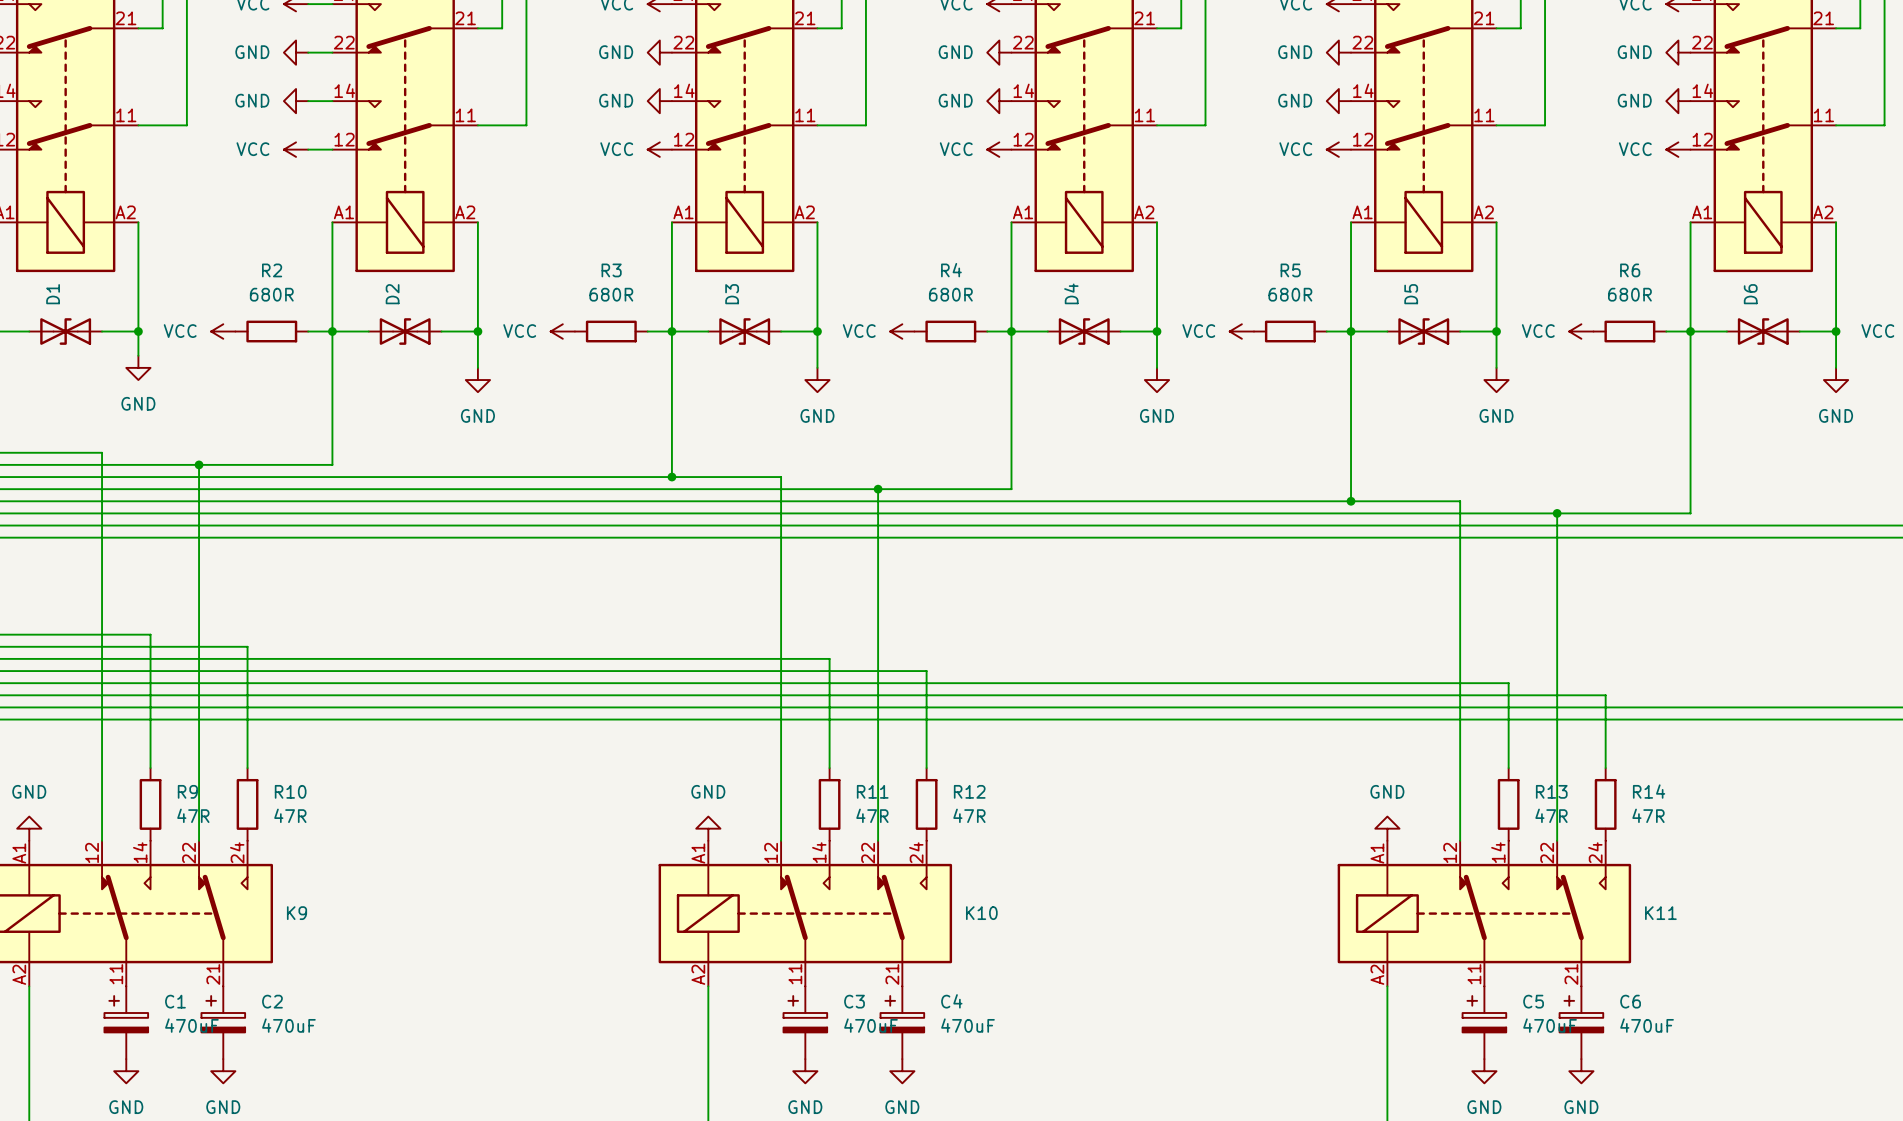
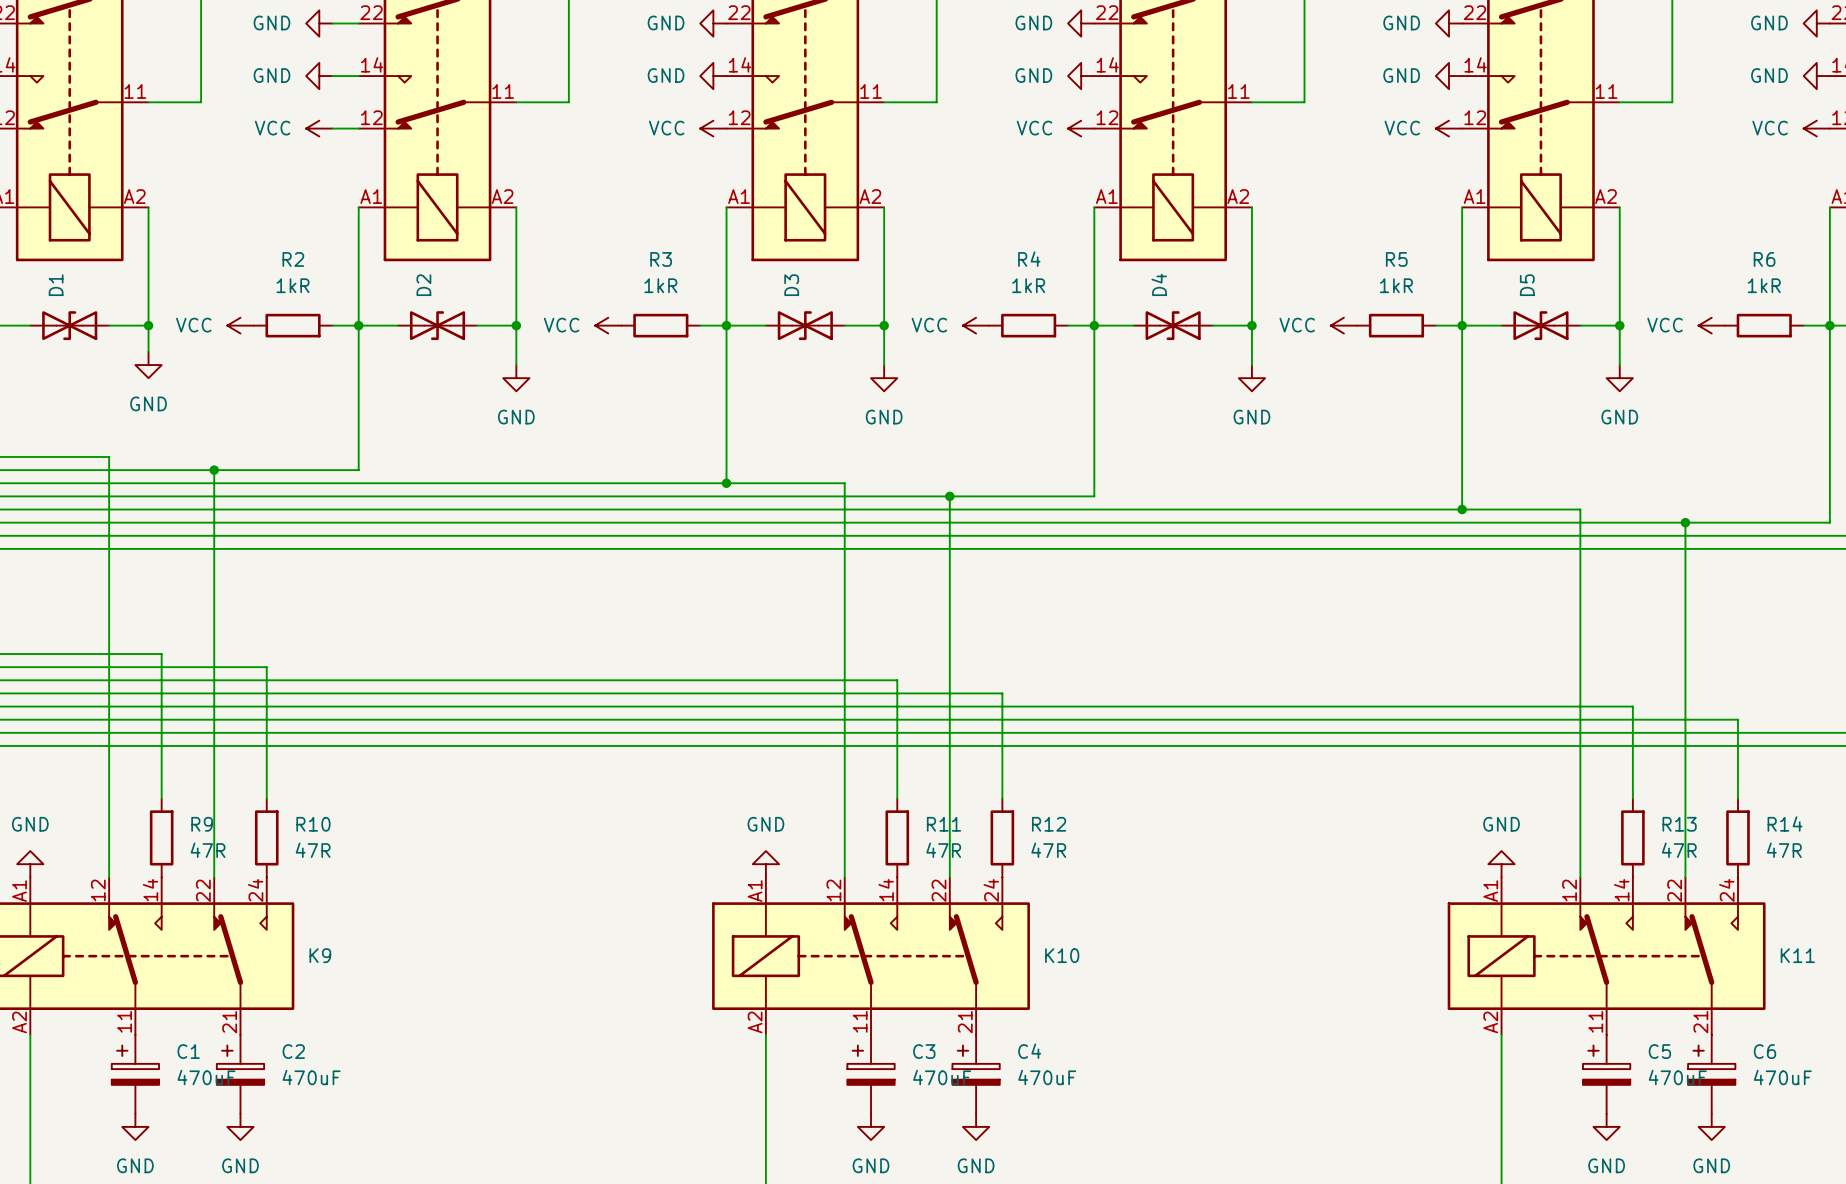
R2 value: 680R (271, 294) -> 1kR (293, 285)
R3 value: 680R (611, 294) -> 1kR (660, 285)
R4 value: 680R (950, 294) -> 1kR (1028, 285)
R5 value: 680R (1290, 294) -> 1kR (1396, 285)
R6 value: 680R (1629, 294) -> 1kR (1764, 285)

